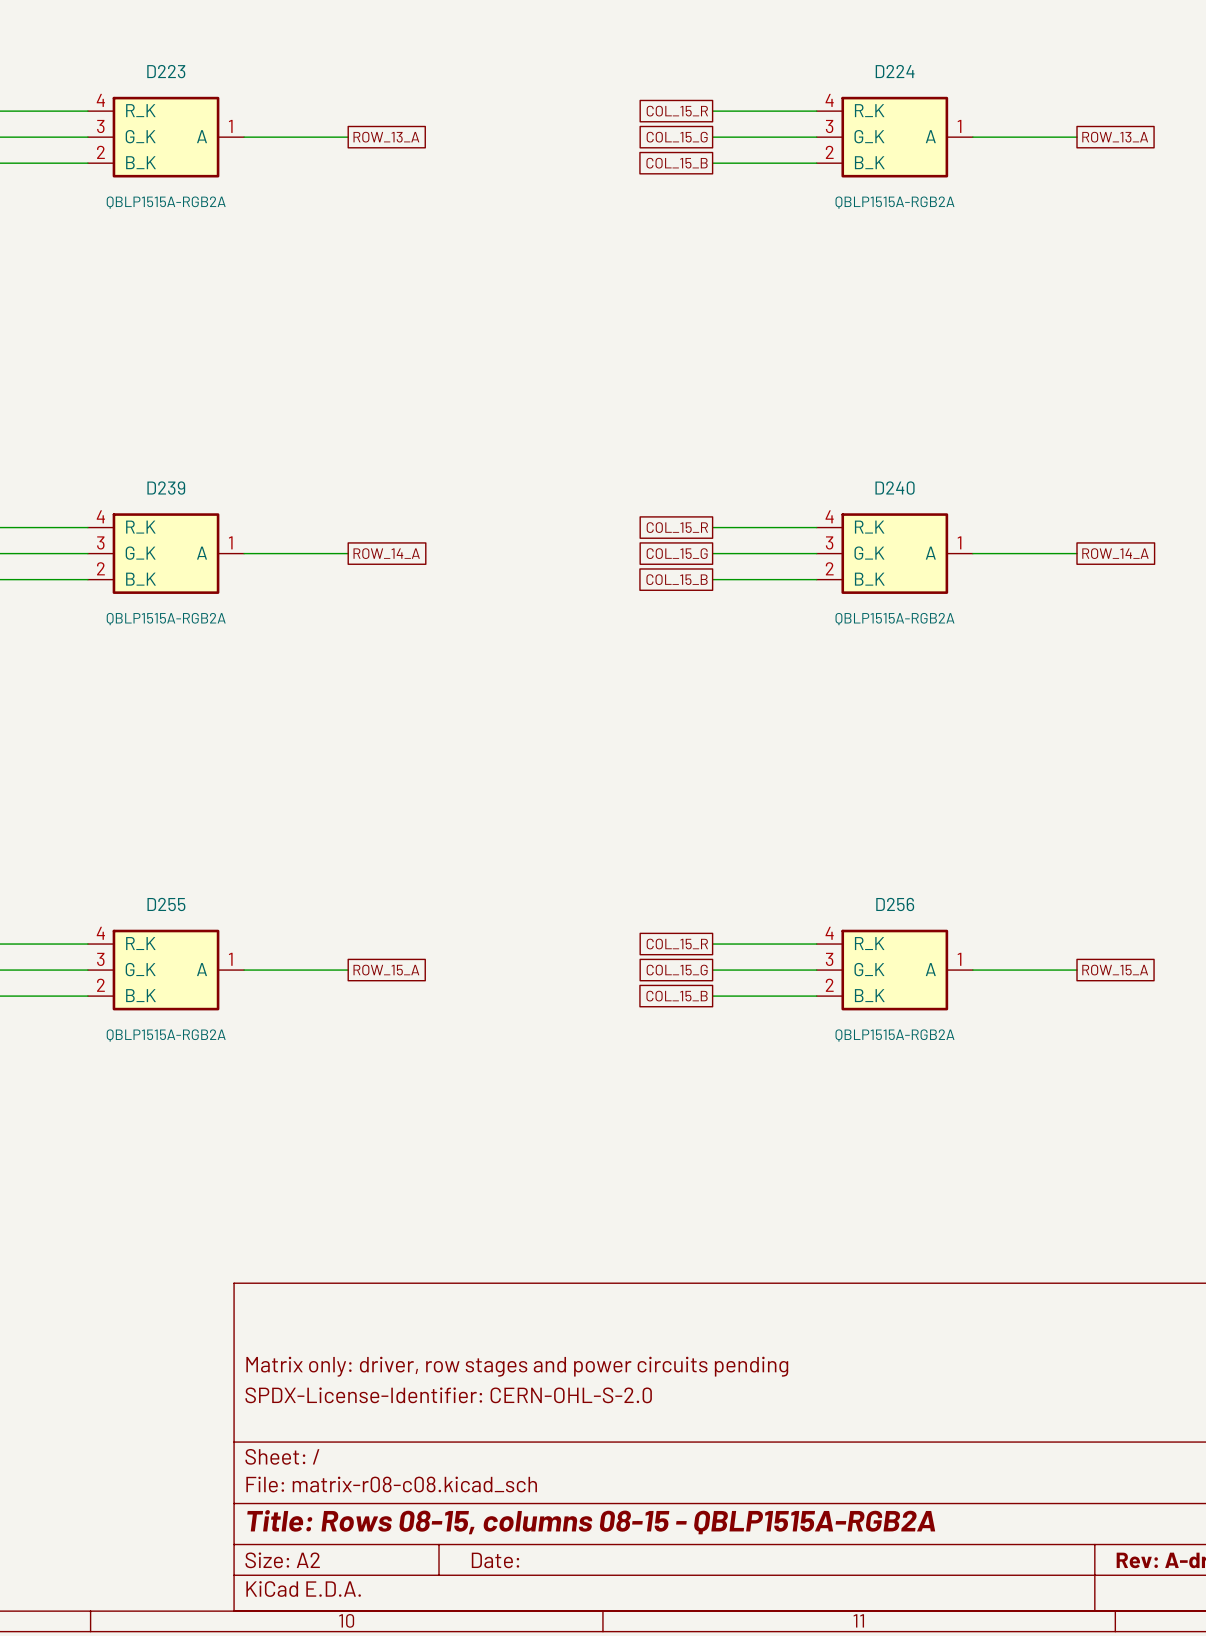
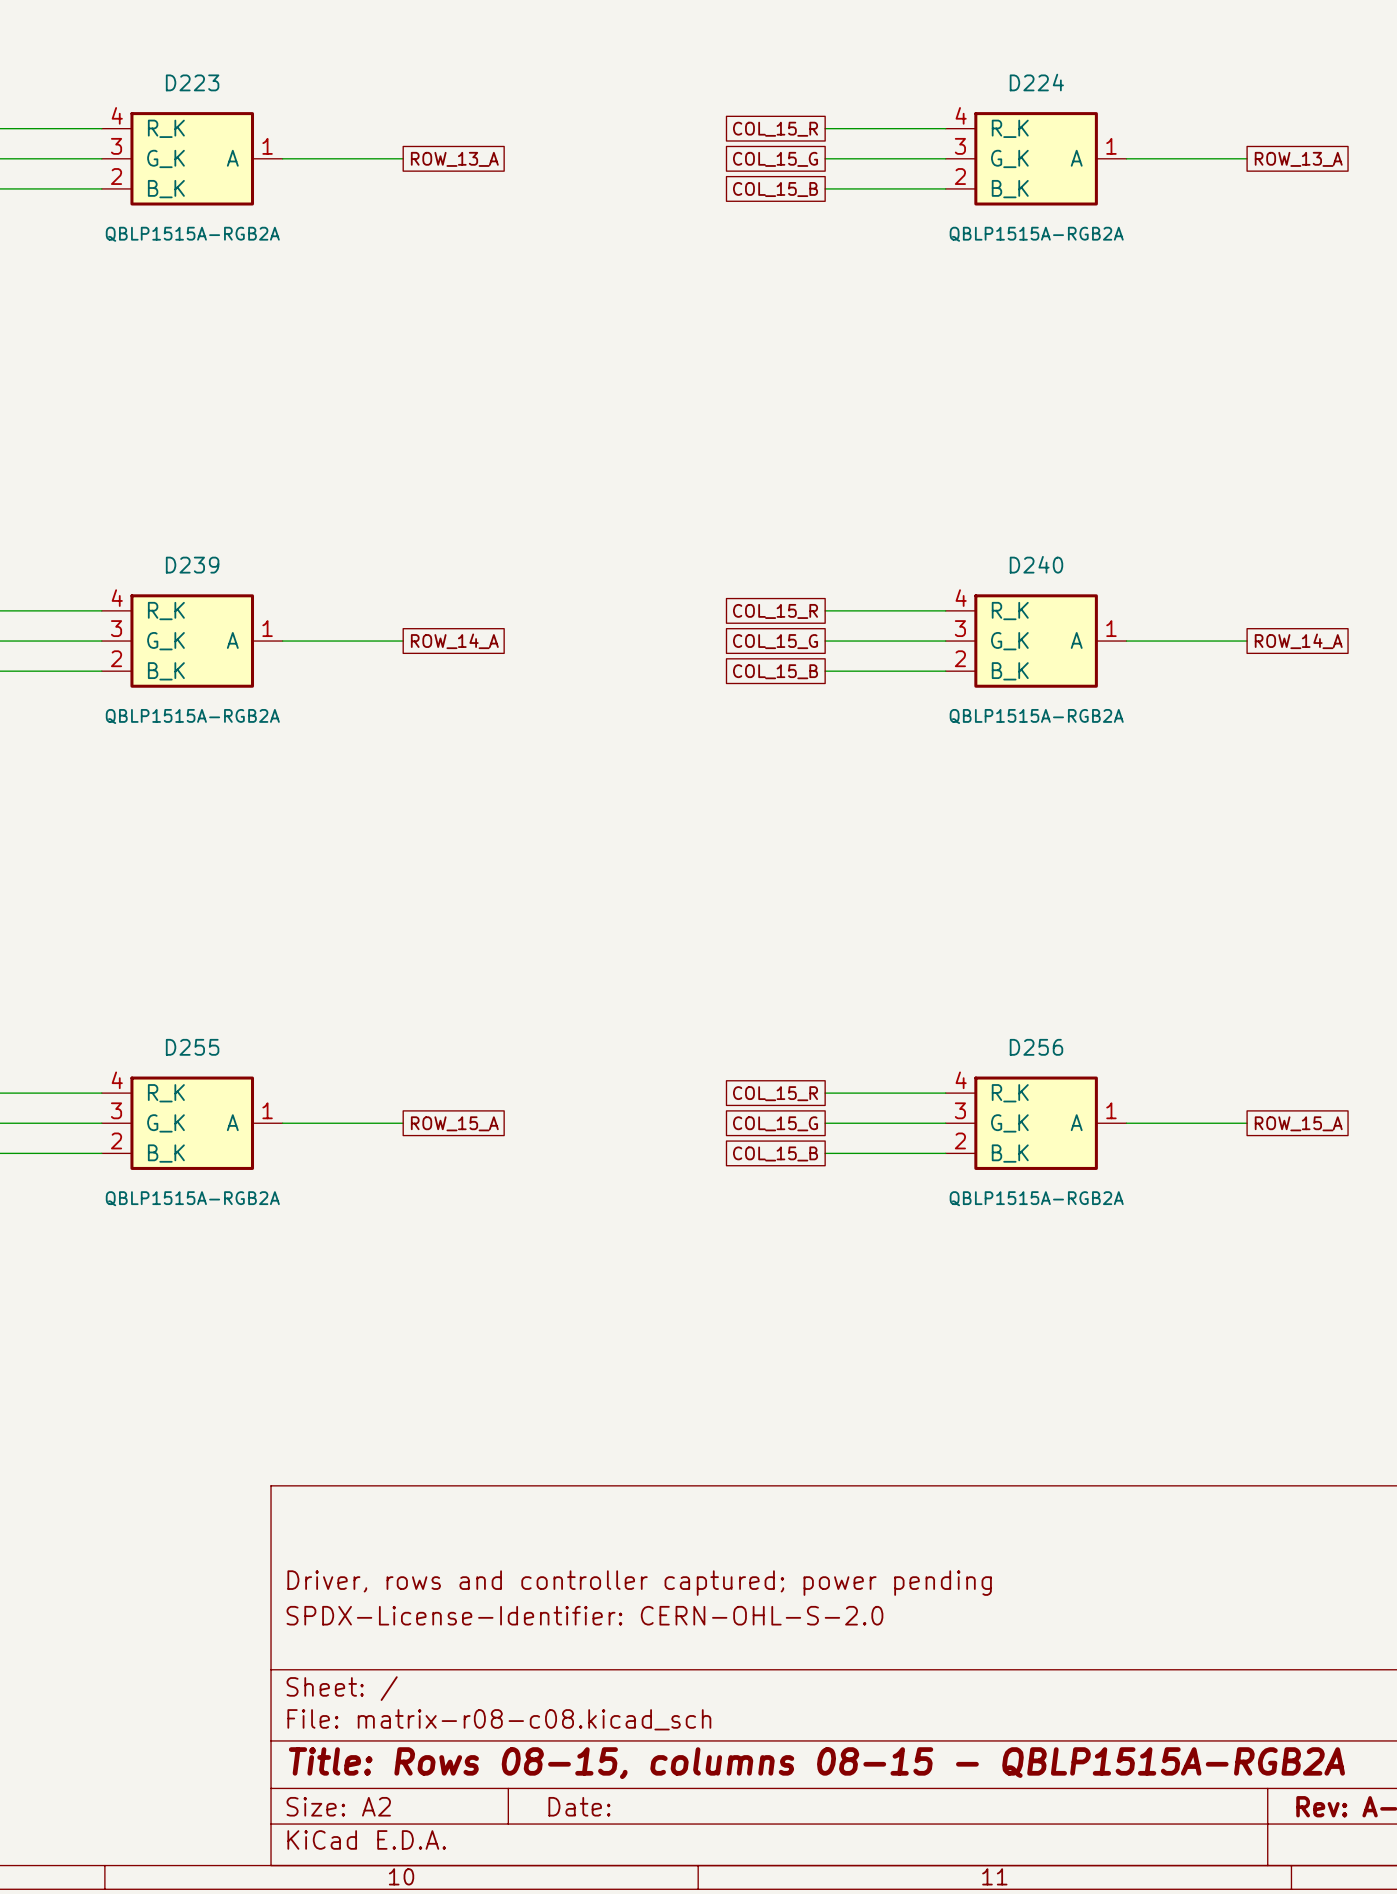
title block: Matrix only: driver, row stages and power circuits pending (517, 1366) -> Driver, rows and controller captured; power pending (639, 1583)

